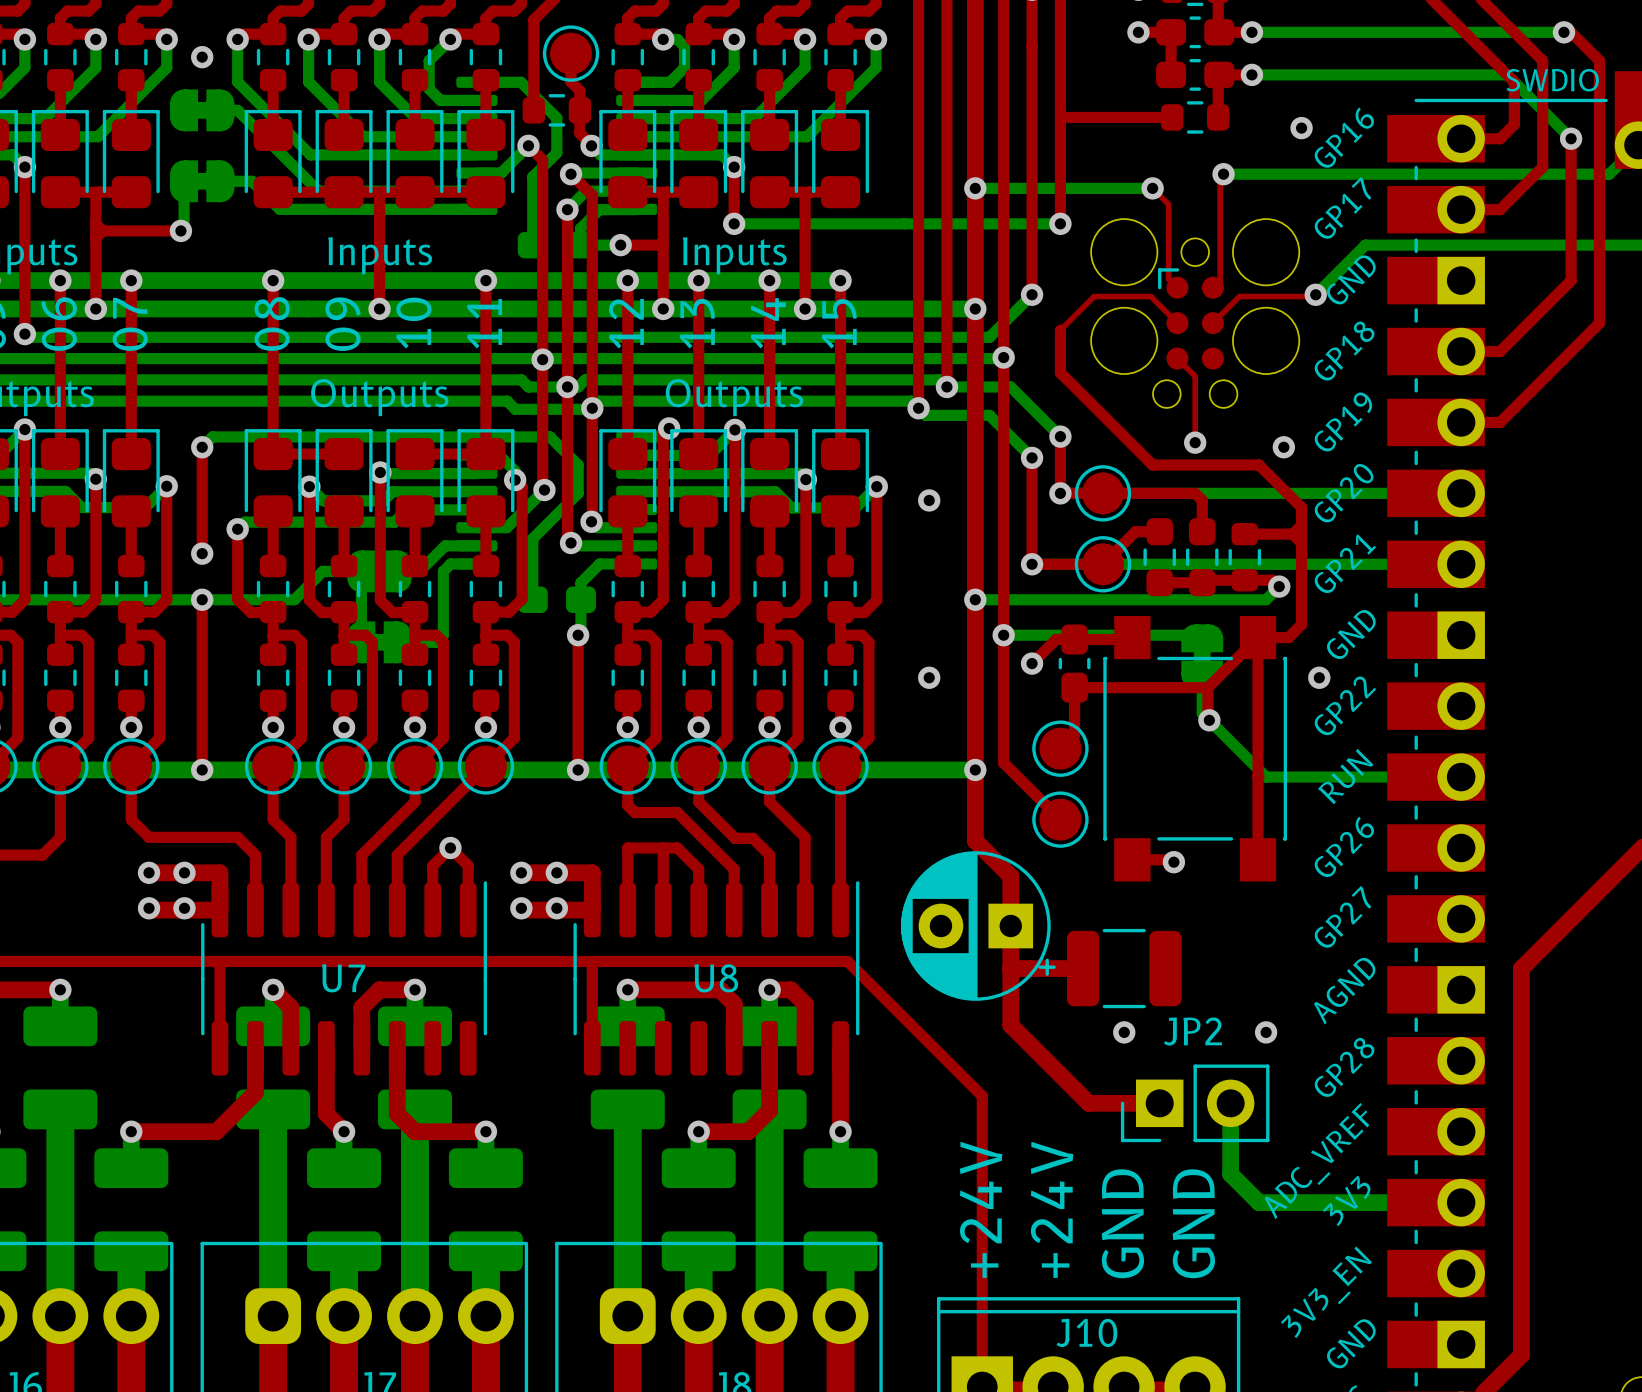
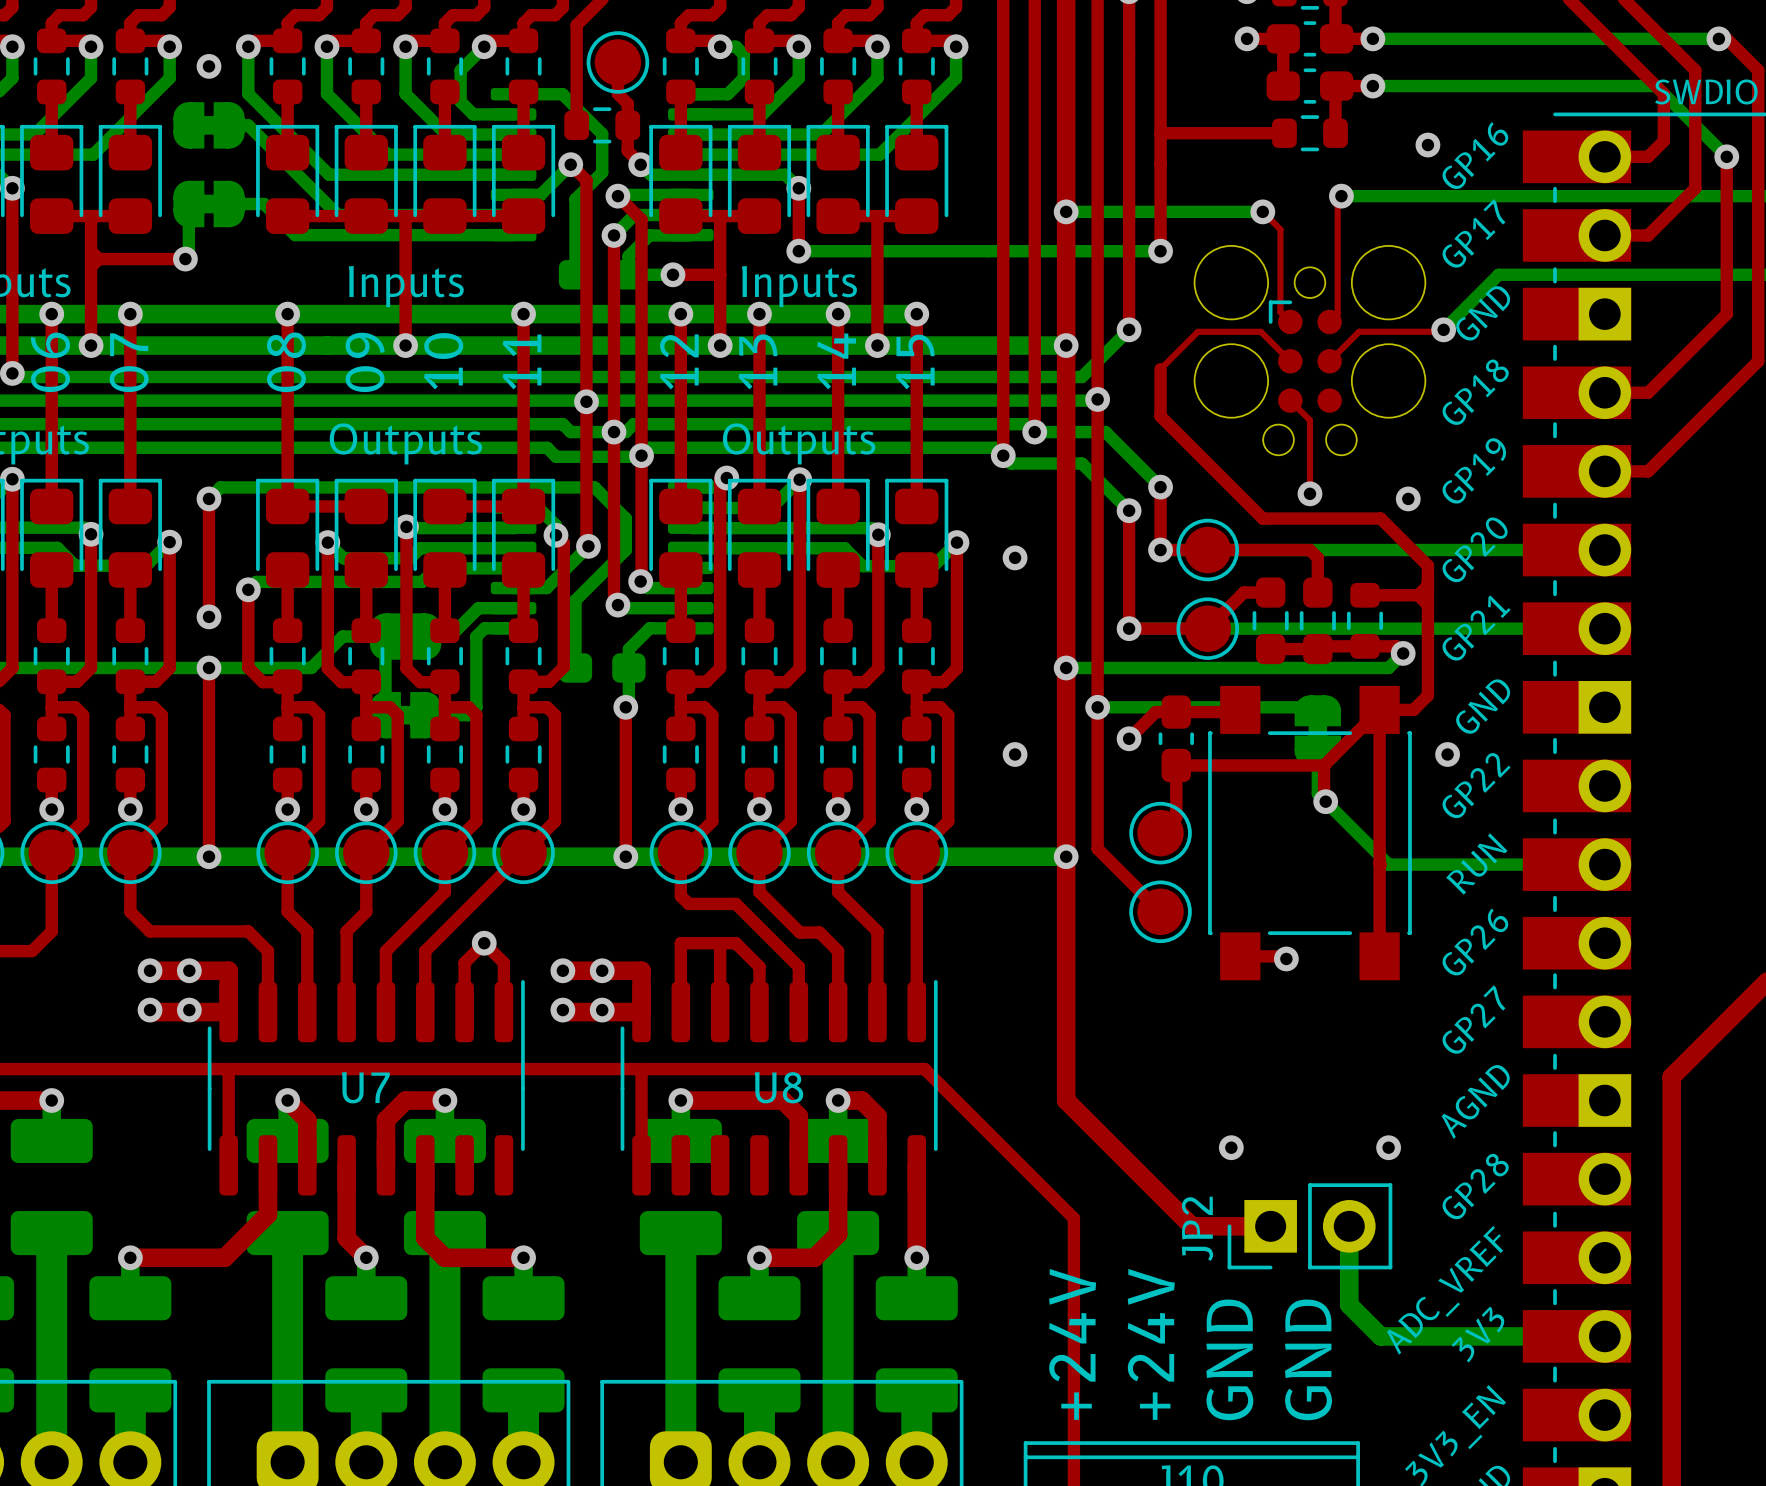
top track: (975, 840) (1010, 876) (1010, 1025) -> (1066, 935) (1066, 1100) (1105, 1139)
part: (978, 926) -> none
top track: (1010, 968) (1083, 968) -> none
part: (1124, 968) -> none
JP2 name rotation: 0° (1192, 1031) -> 90° counterclockwise (1197, 1228)
JP2 name position: JP2 (1192, 1031) -> JP2 (1197, 1228)

